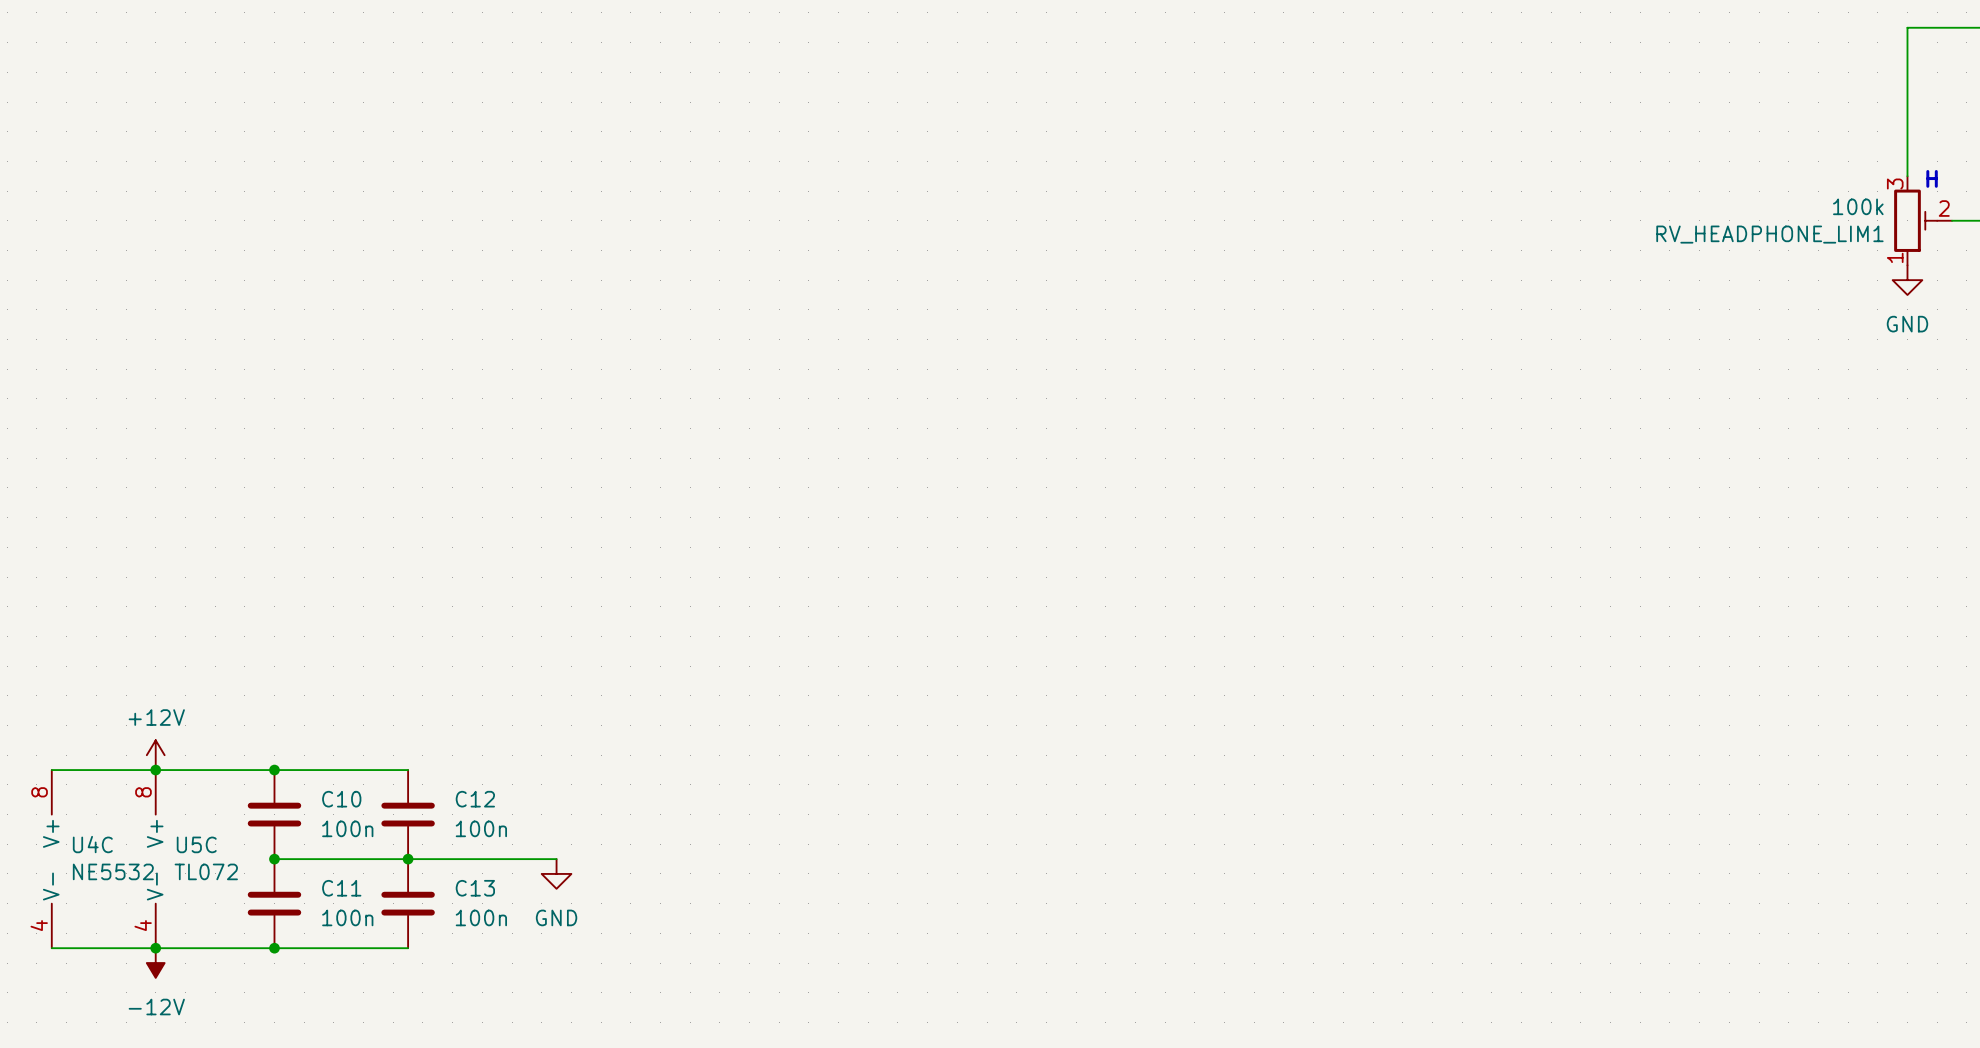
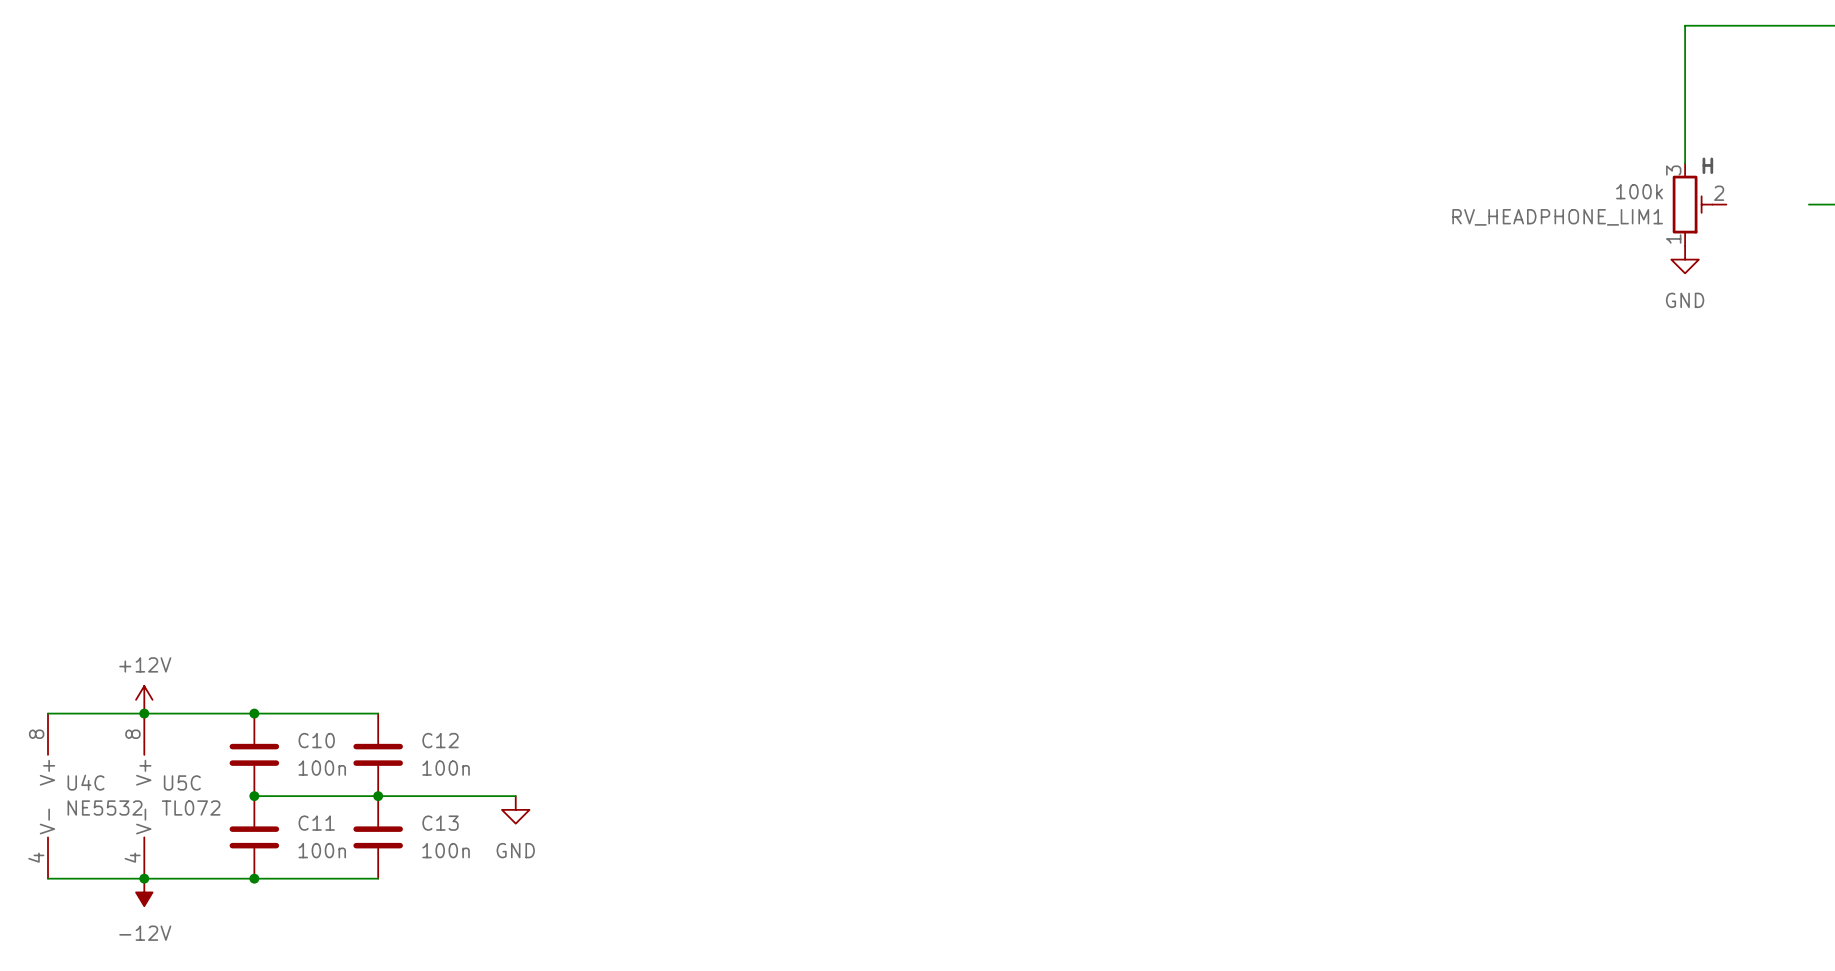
wire: (1907, 27) (1907, 176) -> (1767, 25) (1685, 25) (1685, 163)
text position: H (1932, 178) -> H (1707, 165)
RV_HEADPHONE_LIM1 position: (1923, 220) -> (1699, 204)
power symbol position: GND (1907, 280) -> GND (1685, 259)

